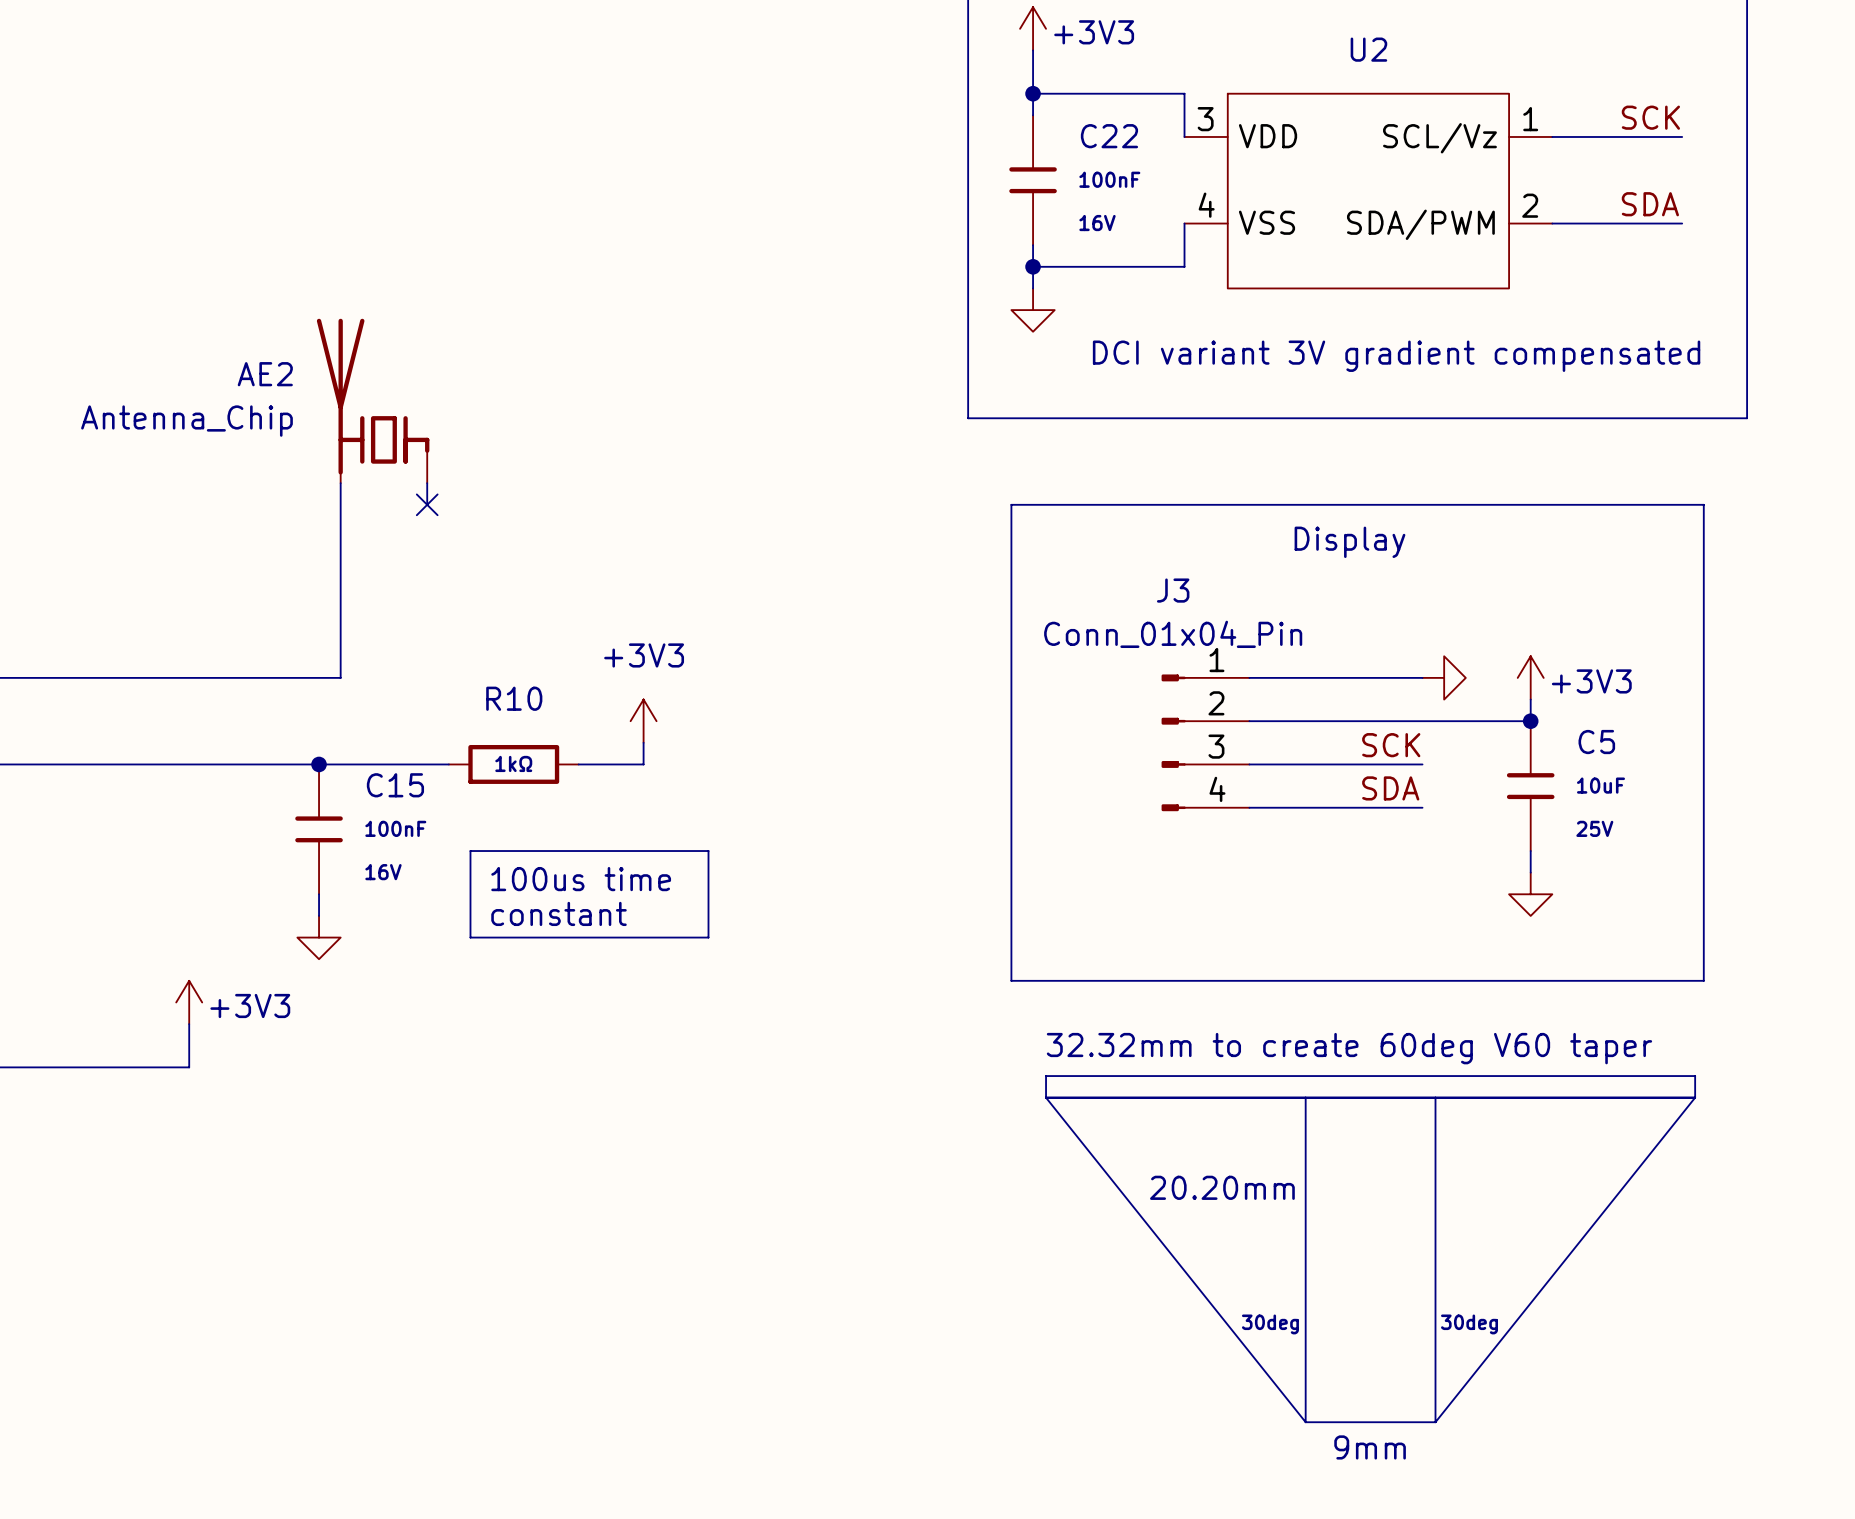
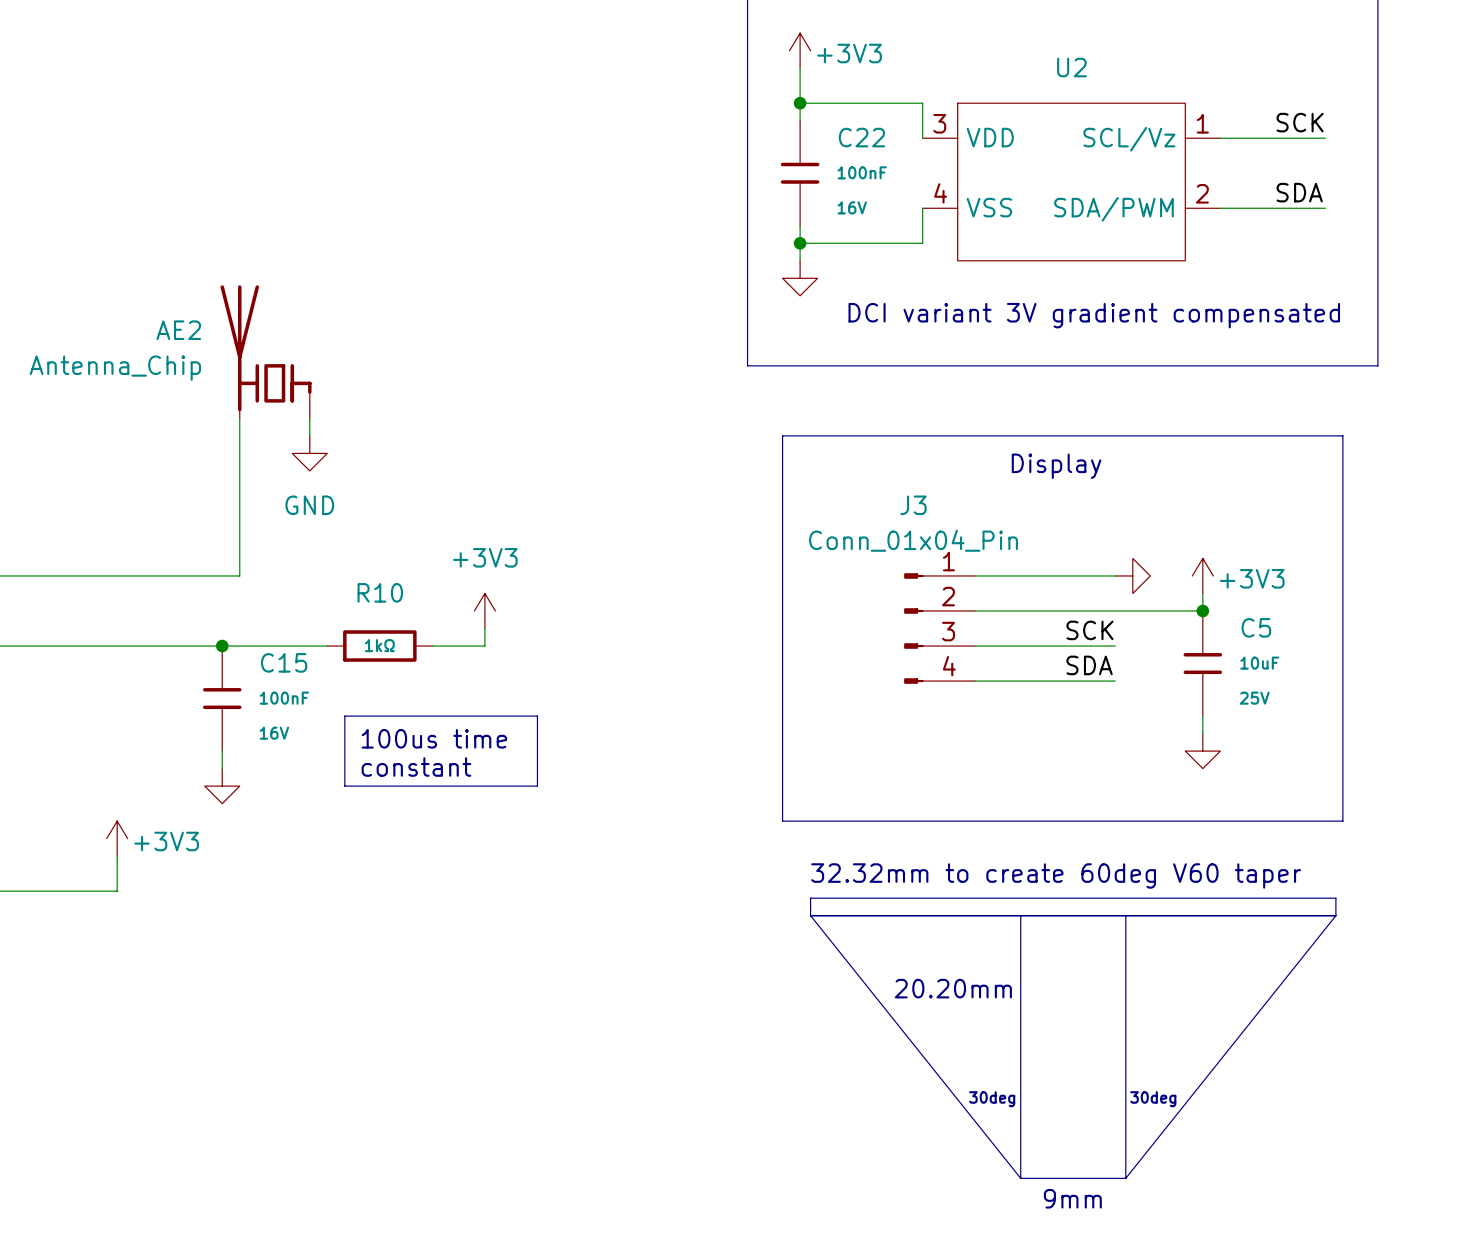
no-connect mark: (427, 504) -> none
power symbol: none -> GND (309, 453)

